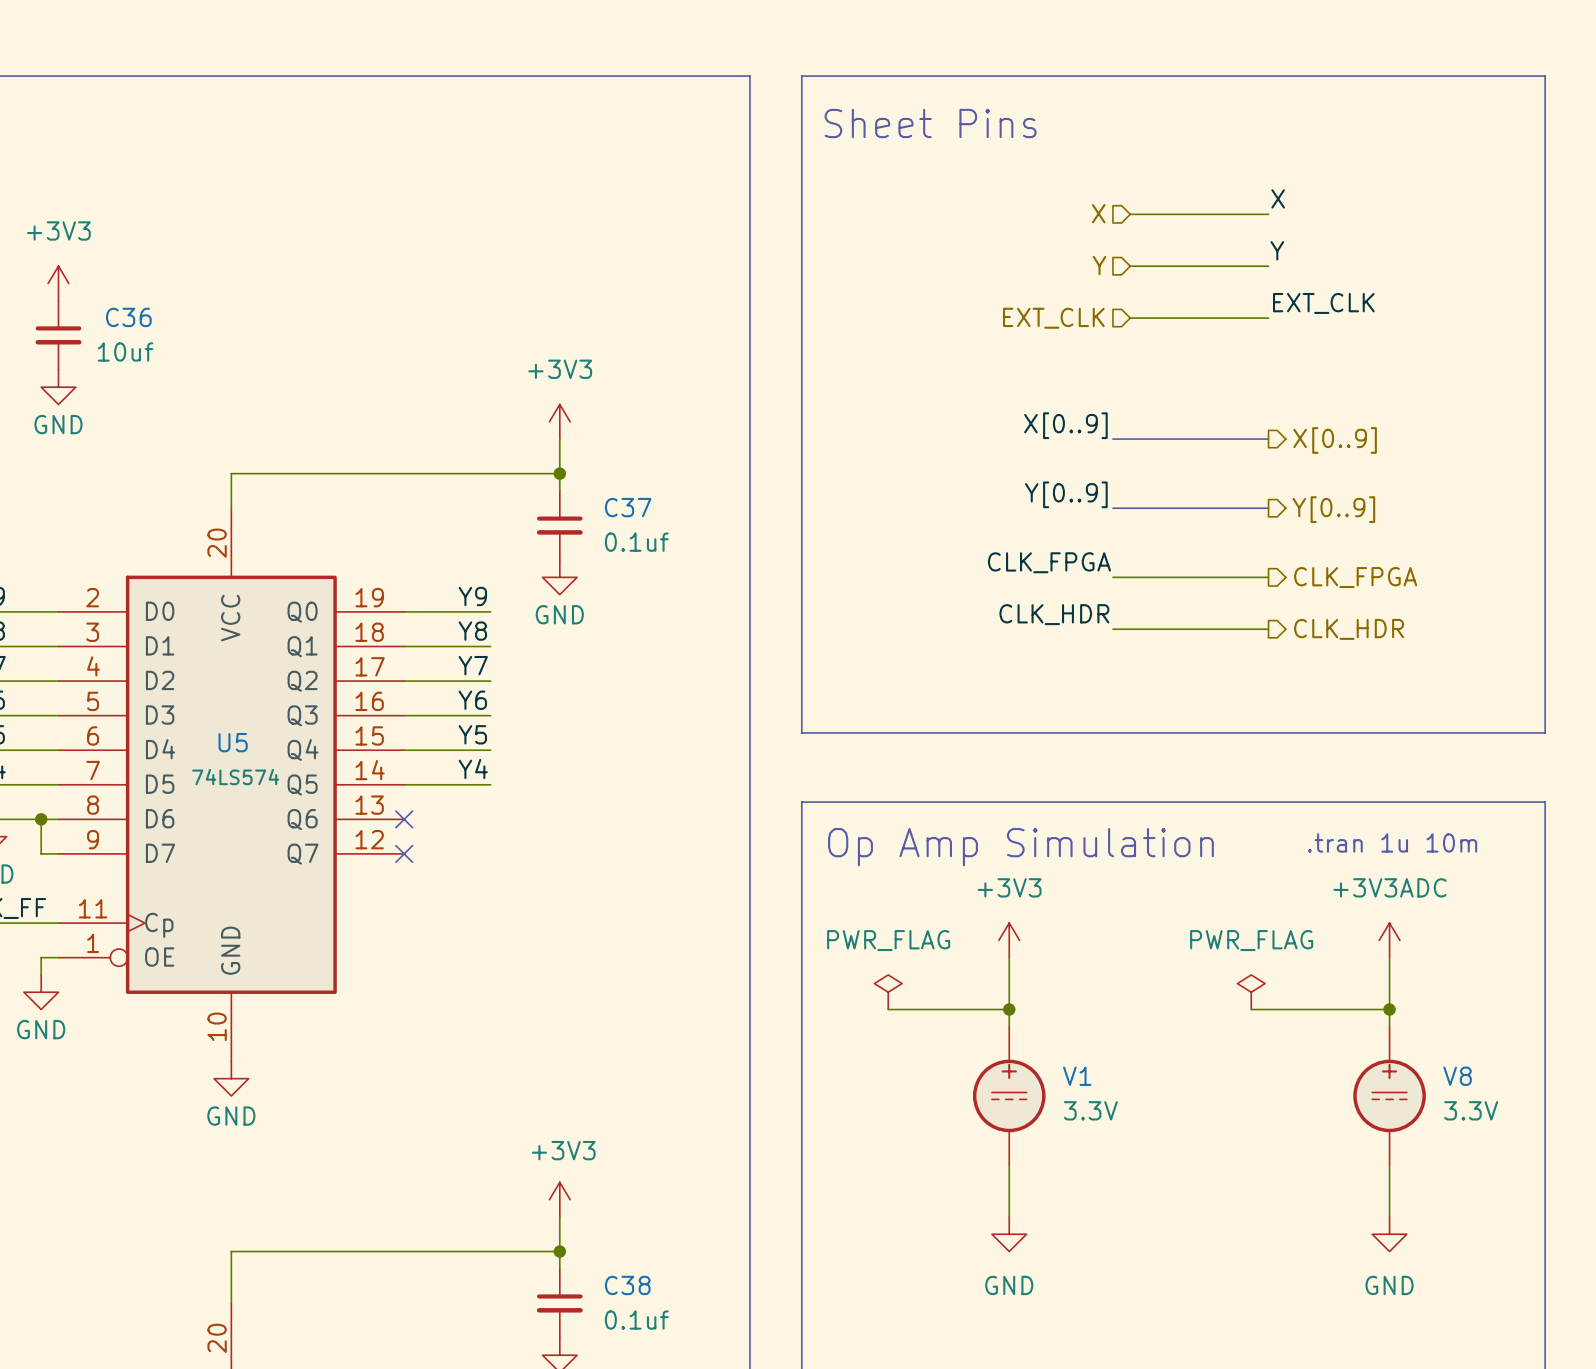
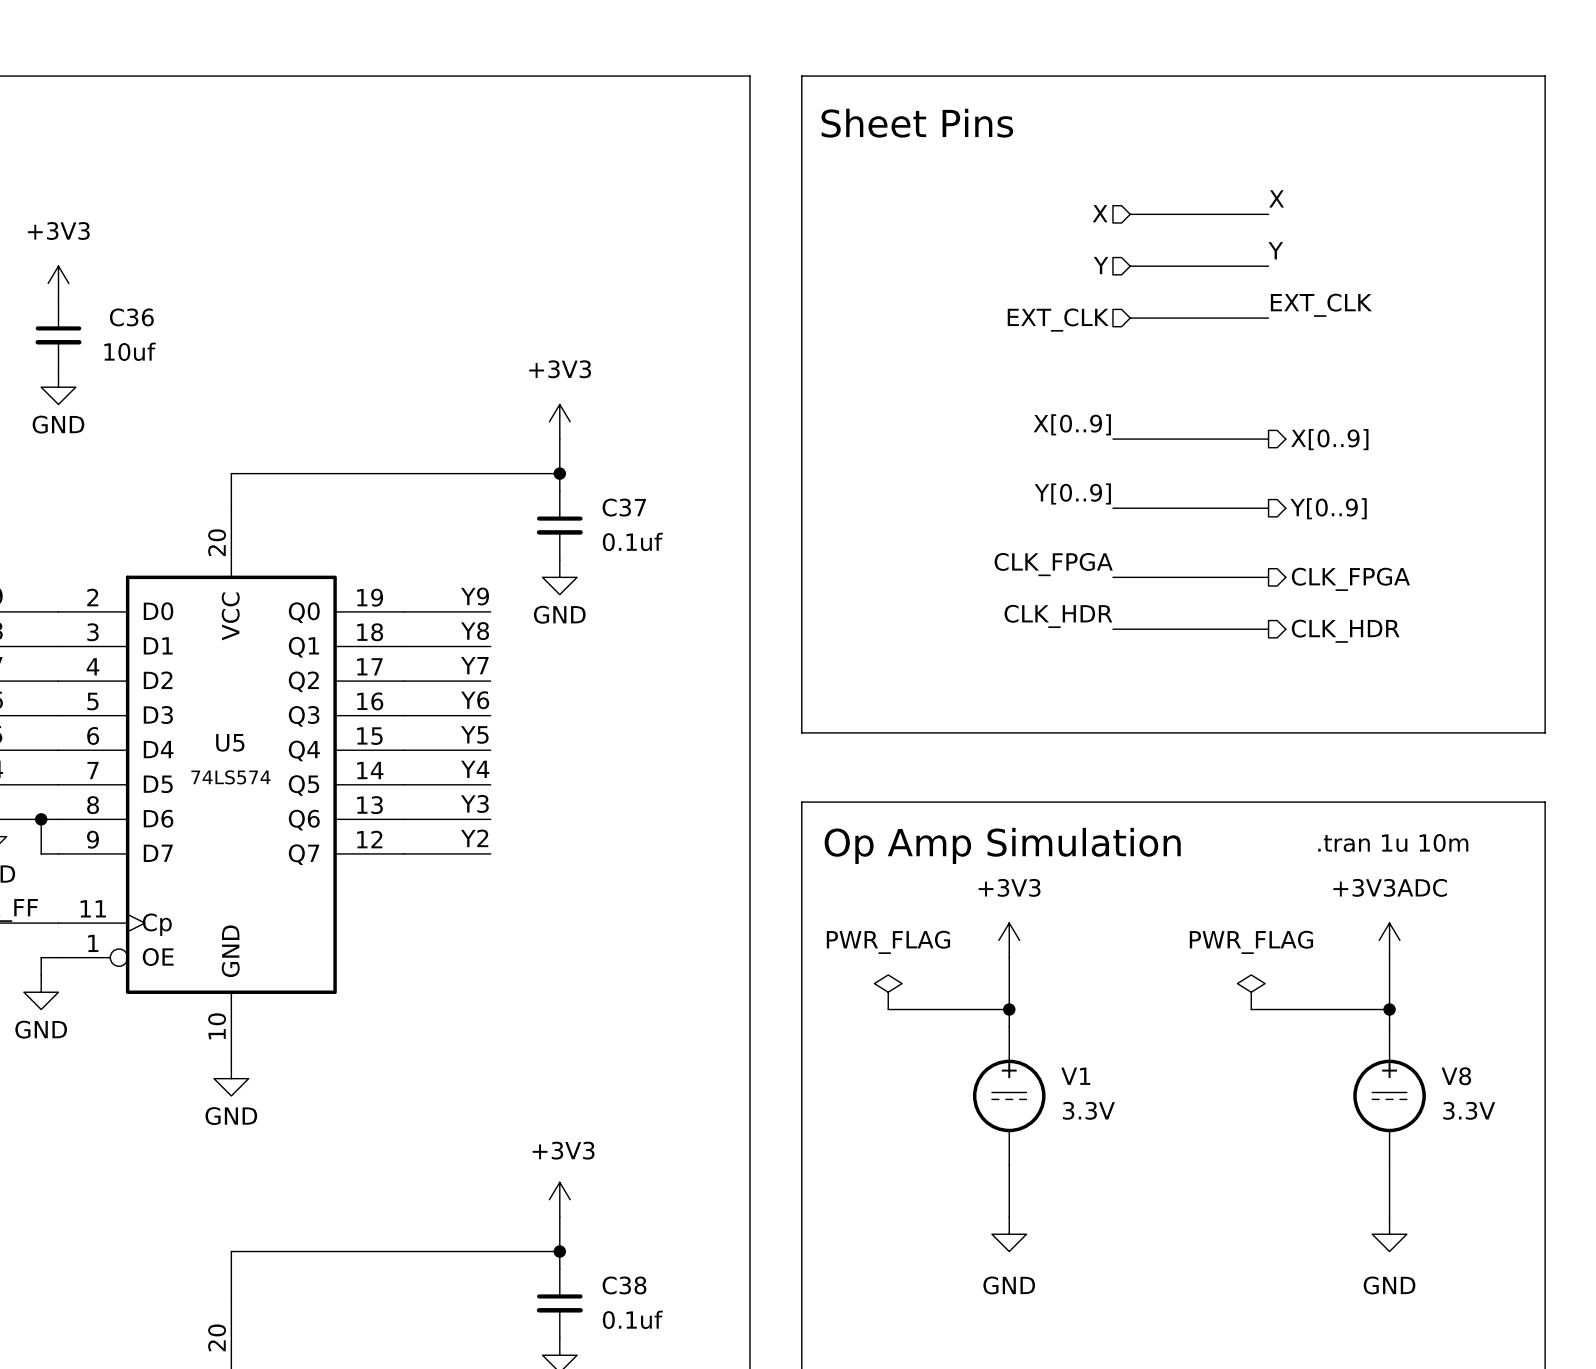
label: none -> Y3 (474, 803)
wire: none -> (404, 819) (490, 819)
no-connect mark: (404, 819) -> none
label: none -> Y2 (474, 838)
wire: none -> (404, 853) (490, 853)
no-connect mark: (404, 853) -> none

